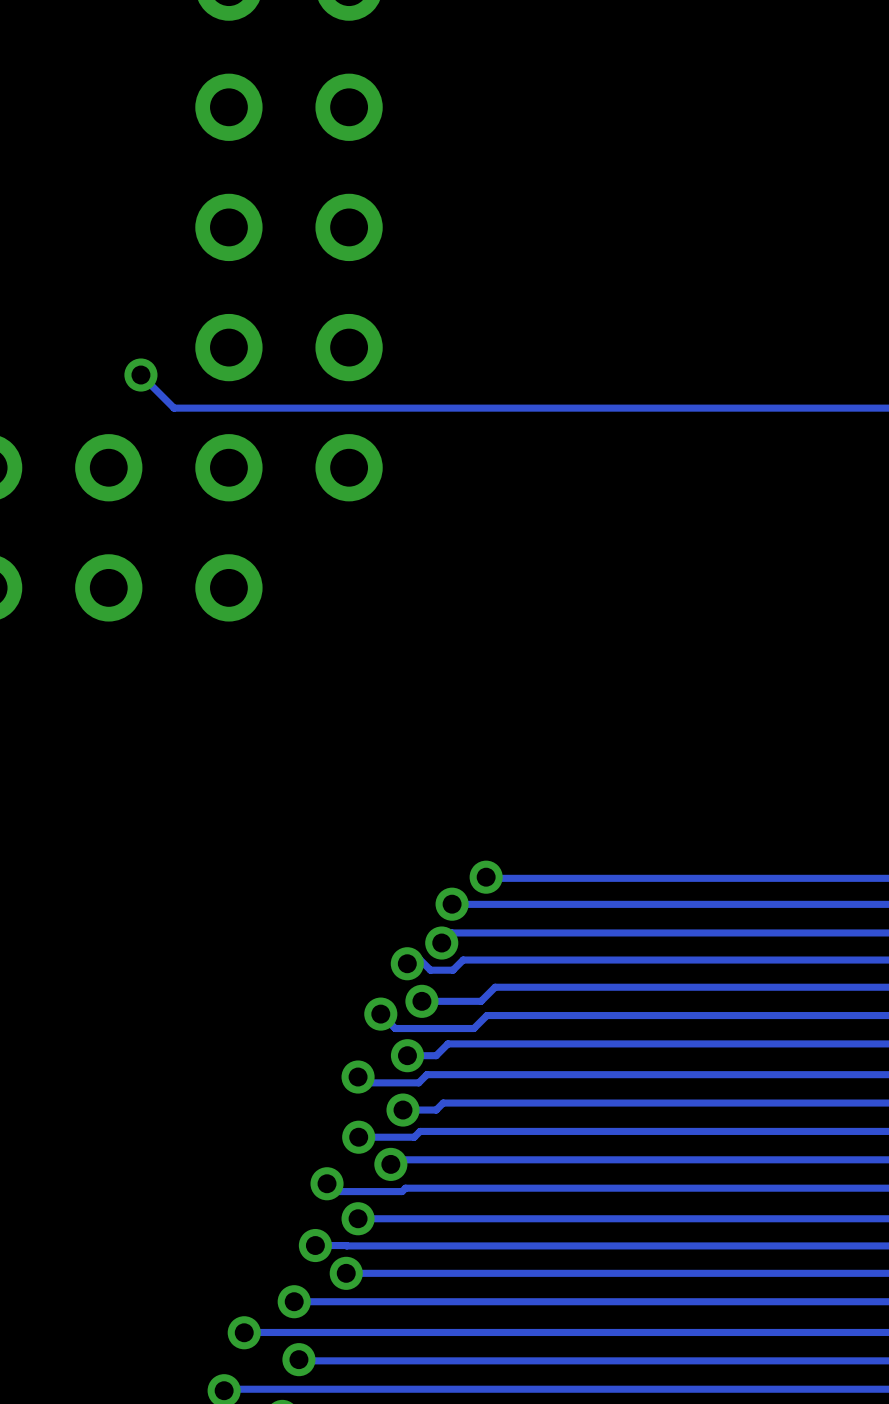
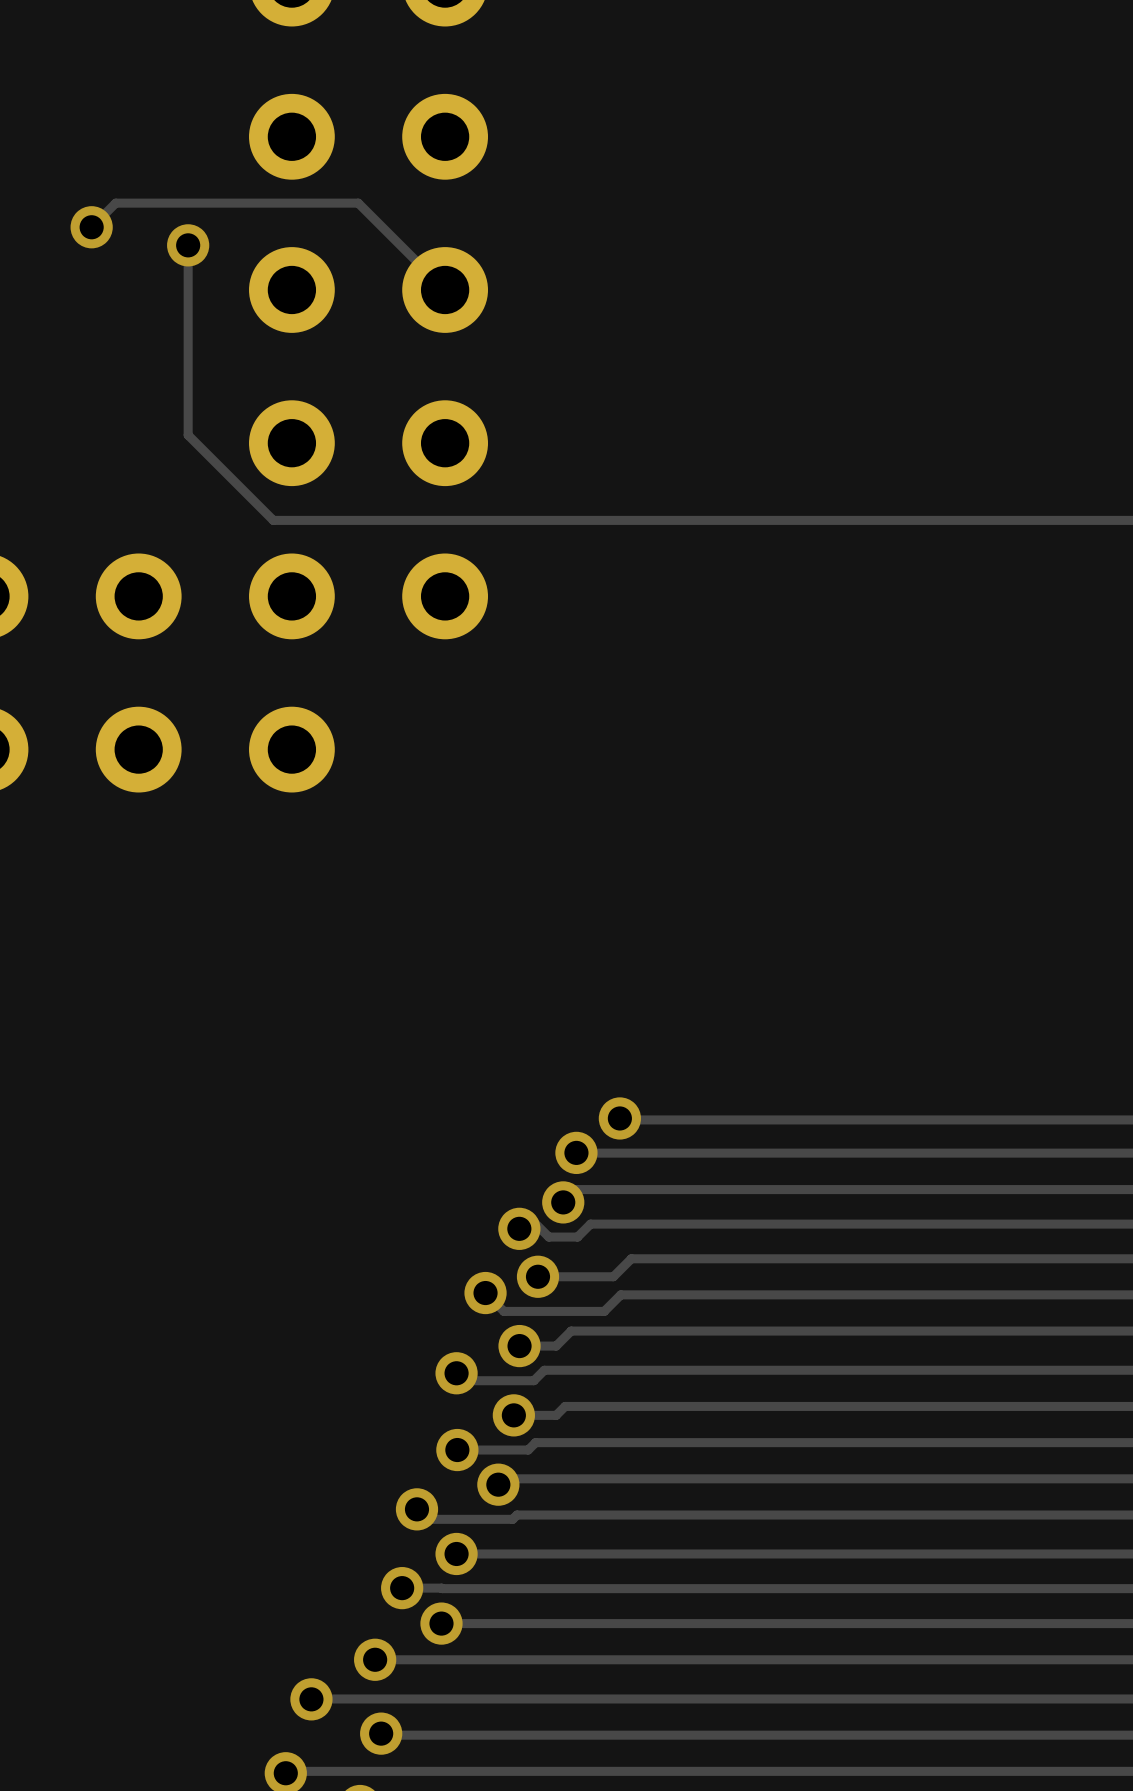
track: none -> (91, 227) (115, 203) (358, 203) (445, 289)
via: none -> (91, 227)
via: none -> (188, 245)
track: (140, 375) (174, 408) (214, 408) -> (188, 245) (188, 435) (273, 520)
via: (140, 375) -> none

